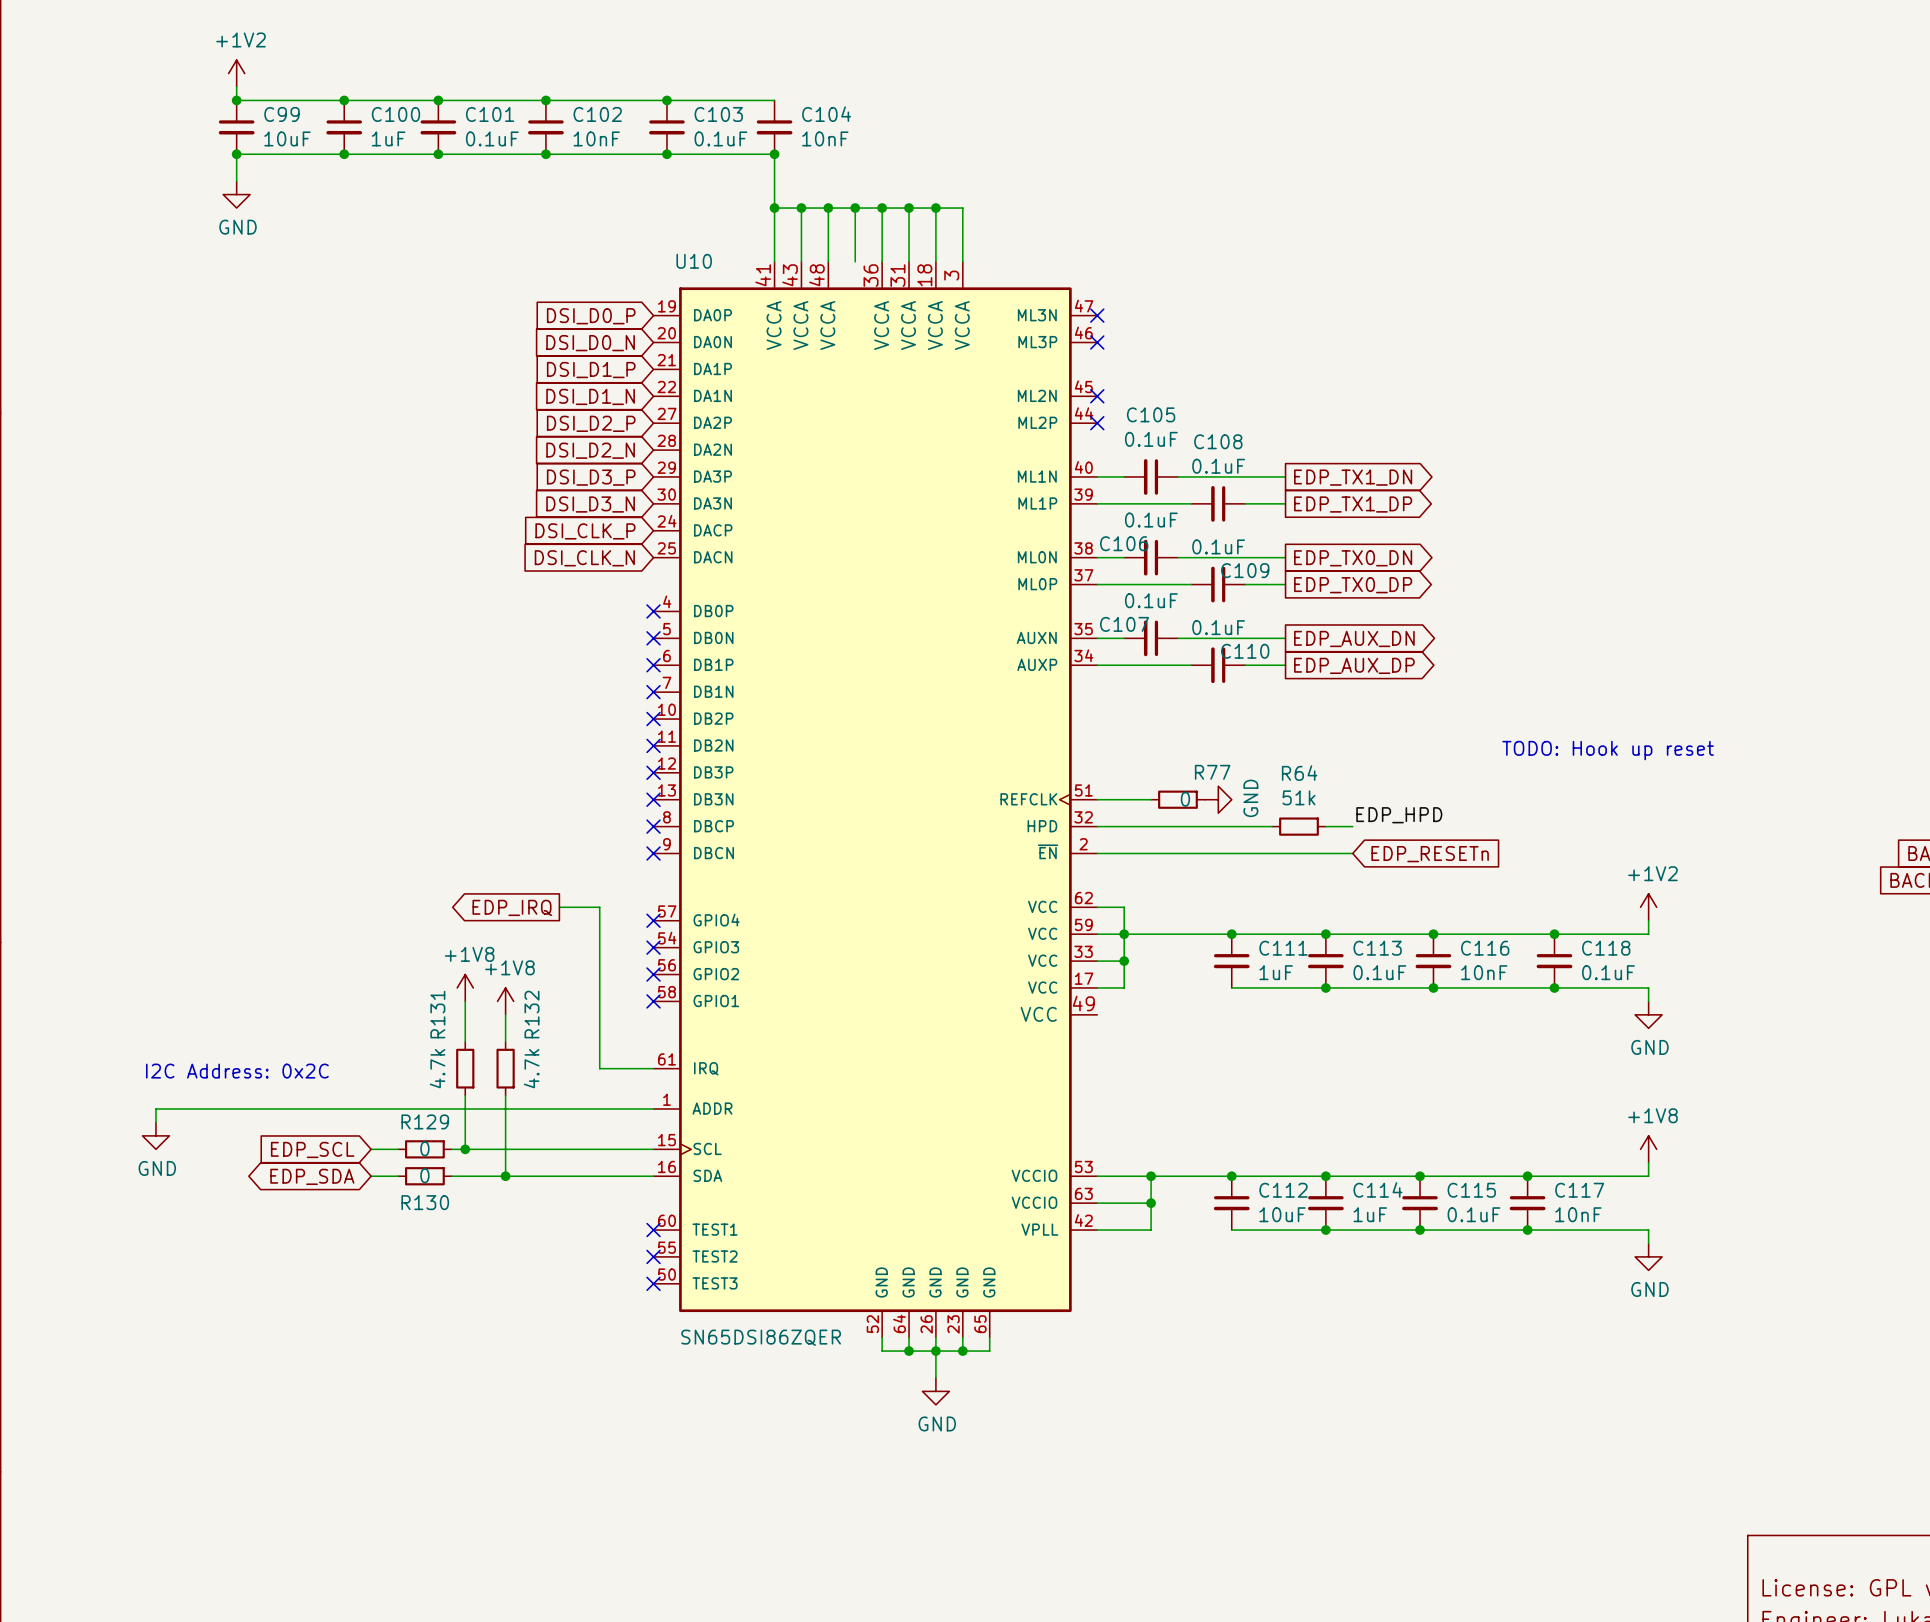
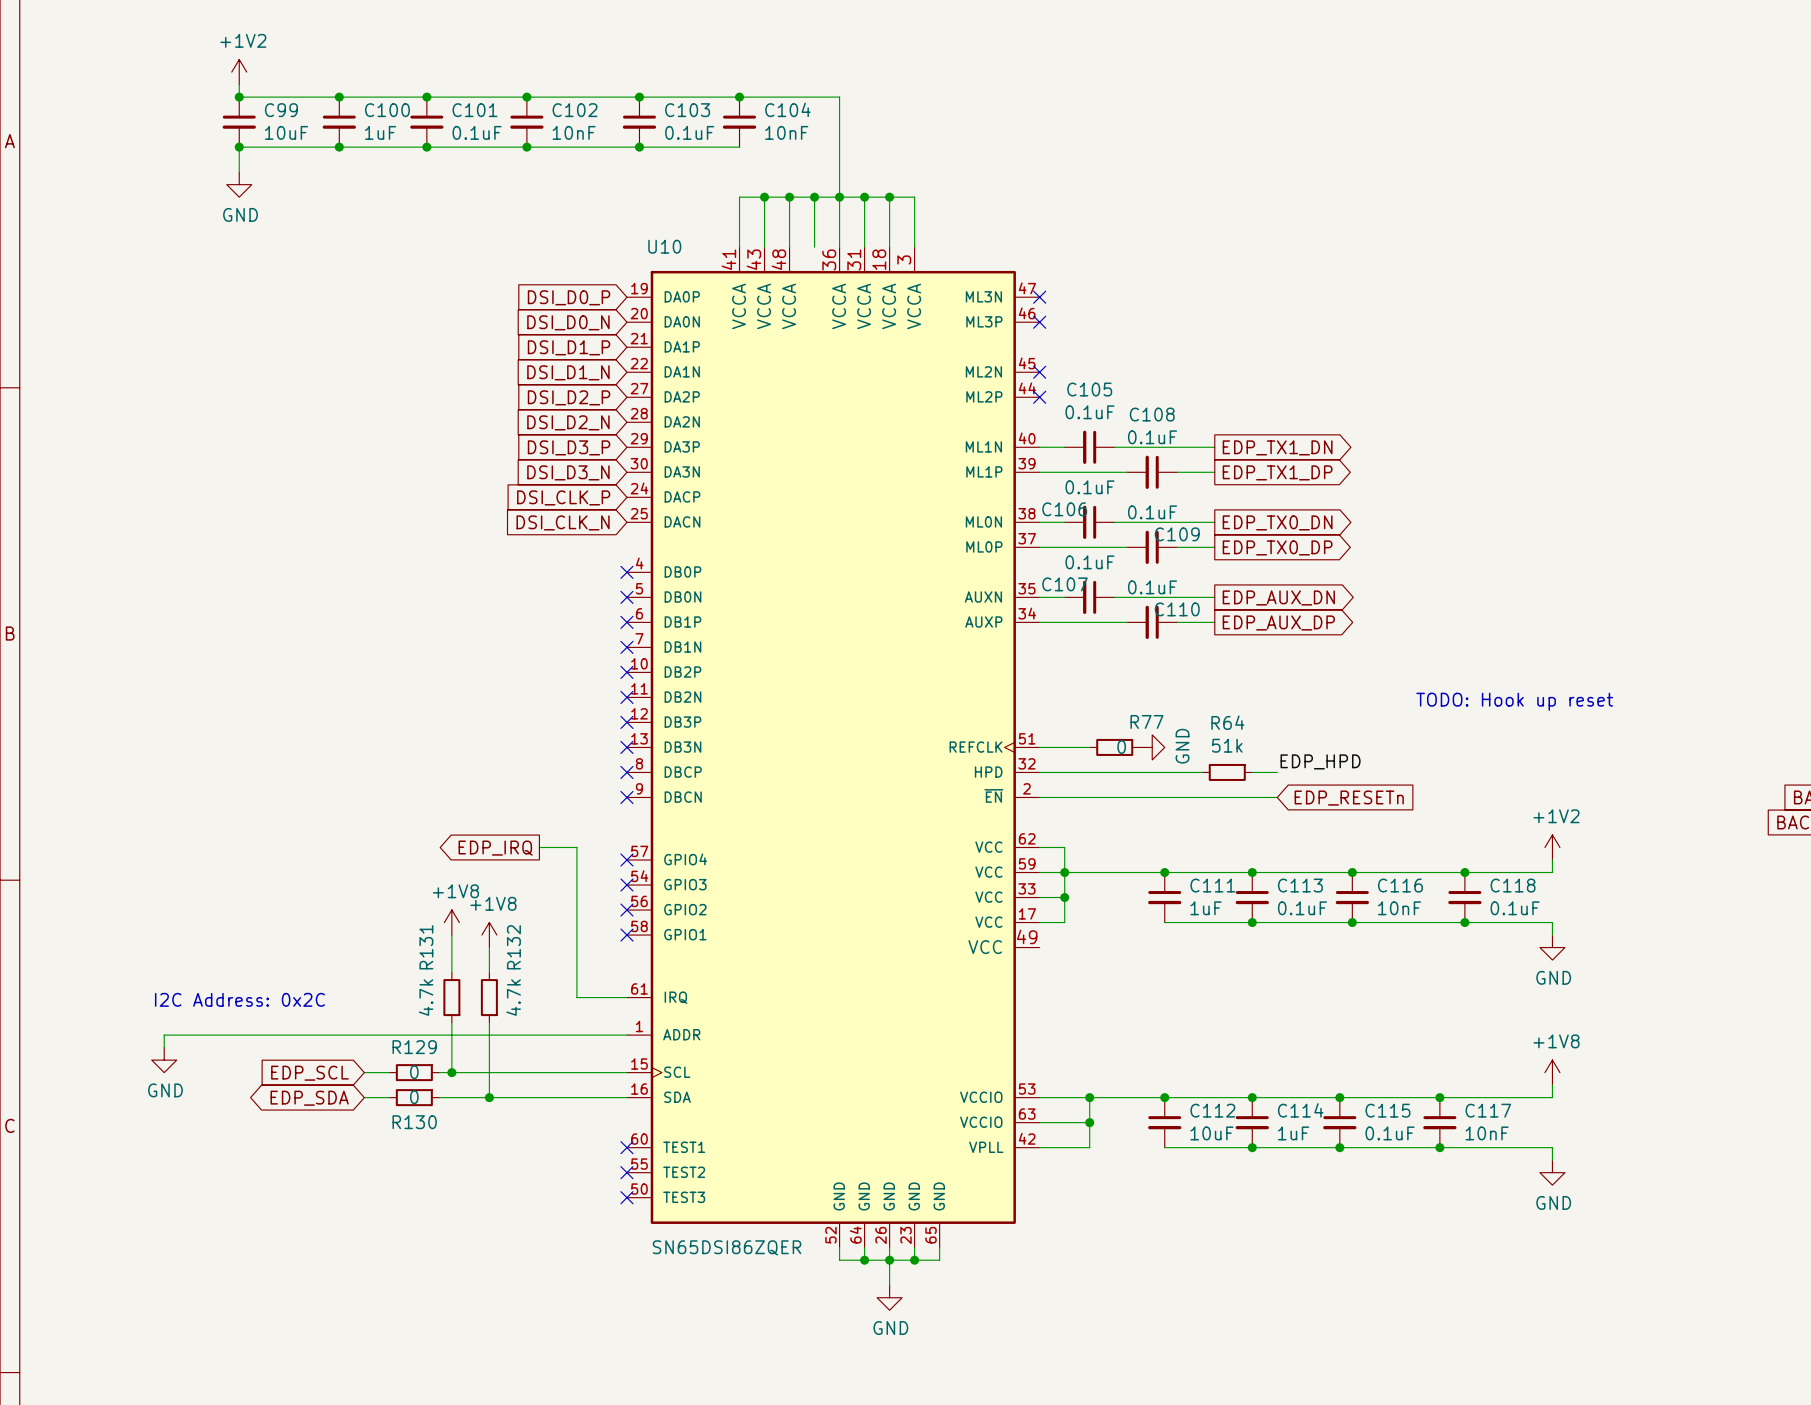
wire: none -> (739, 97) (839, 97) (839, 197)
junction: none -> (739, 97)
wire: (774, 154) (774, 208) -> none
junction: (774, 154) -> none
junction: (774, 208) -> none

